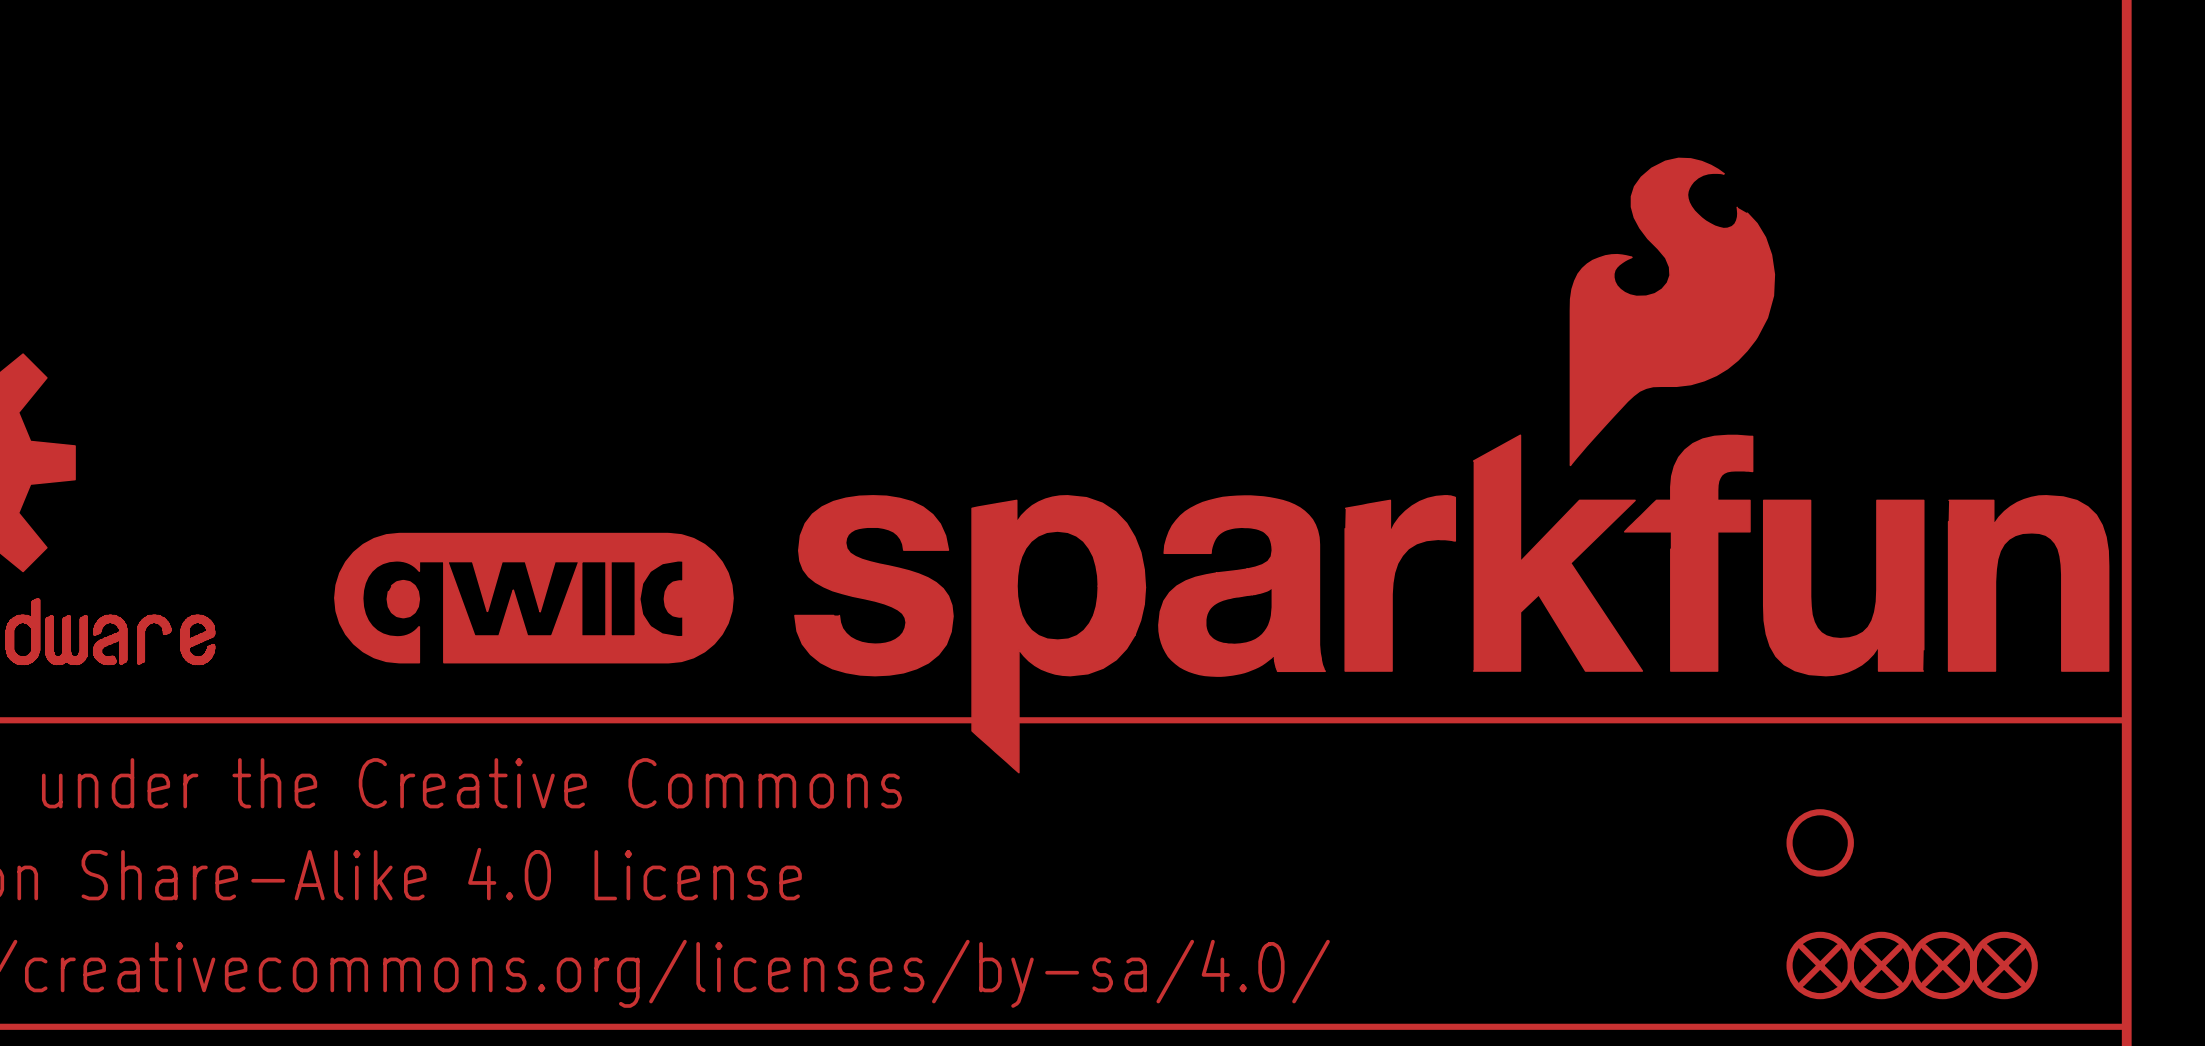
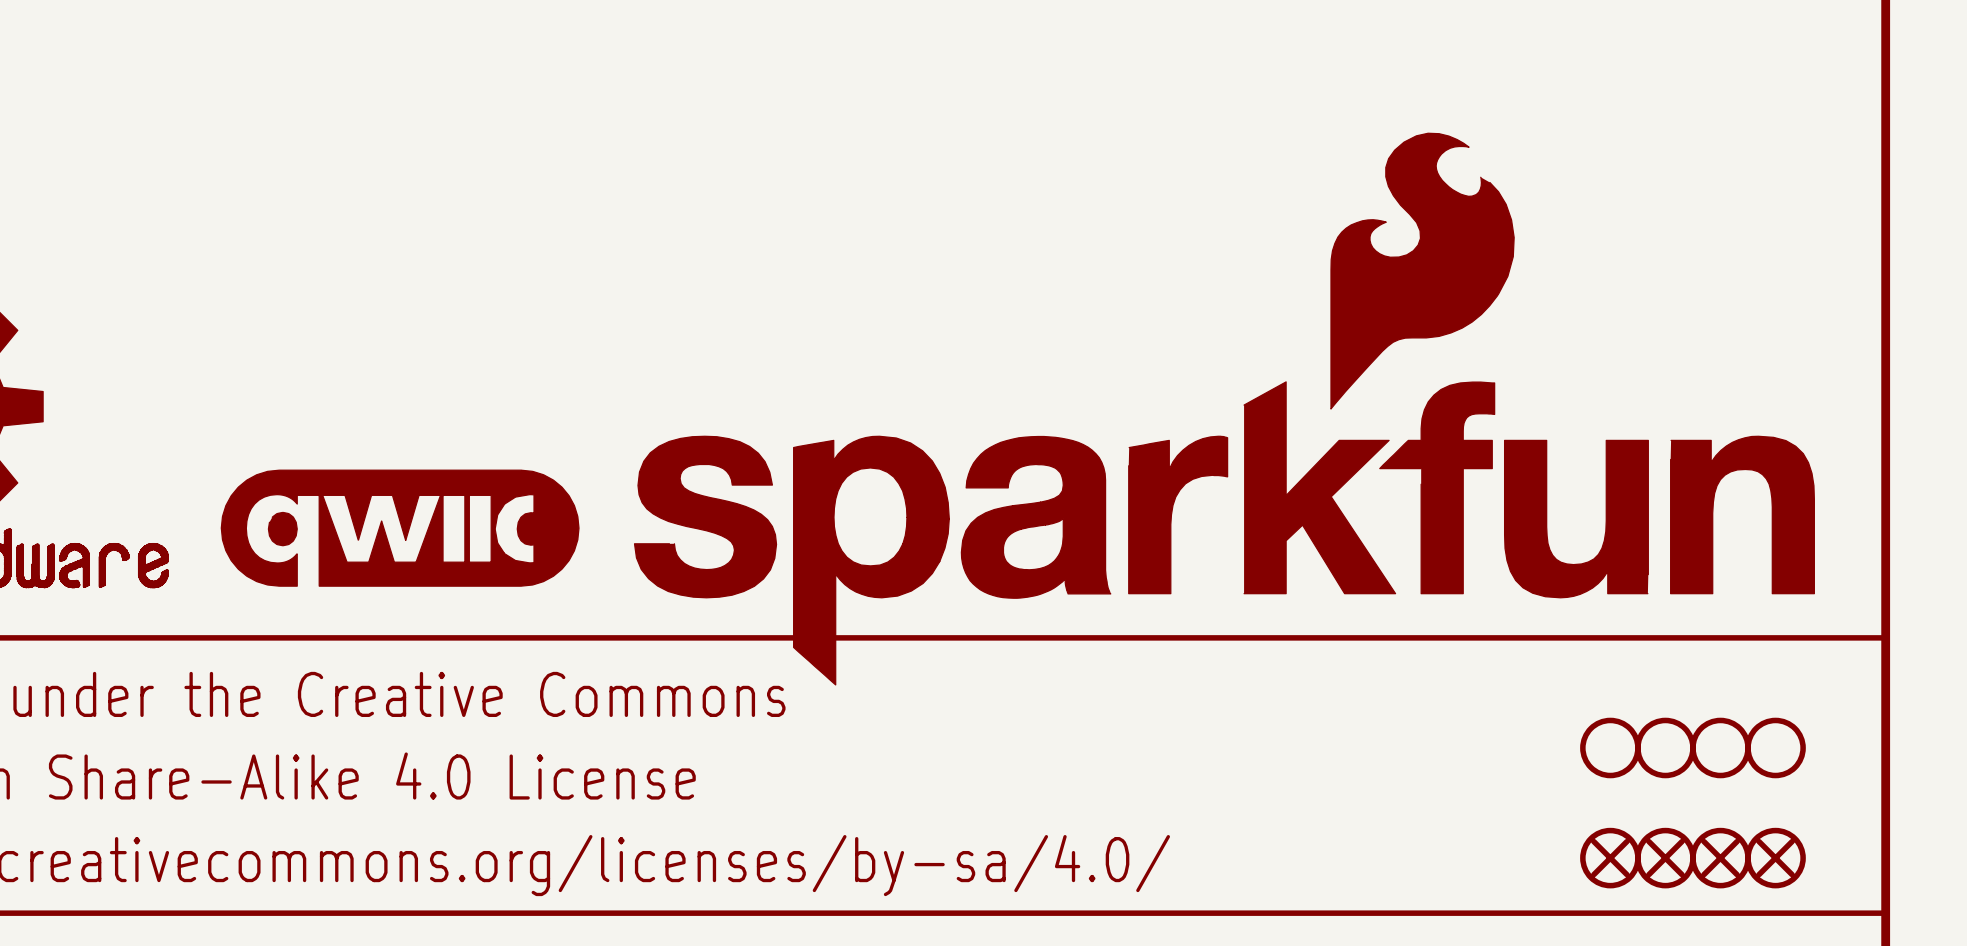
part position: (1451, 465) -> (1224, 409)
part position: (533, 598) -> (400, 528)
part: none -> (1665, 748)
part: none -> (1720, 748)
part: none -> (1775, 748)

